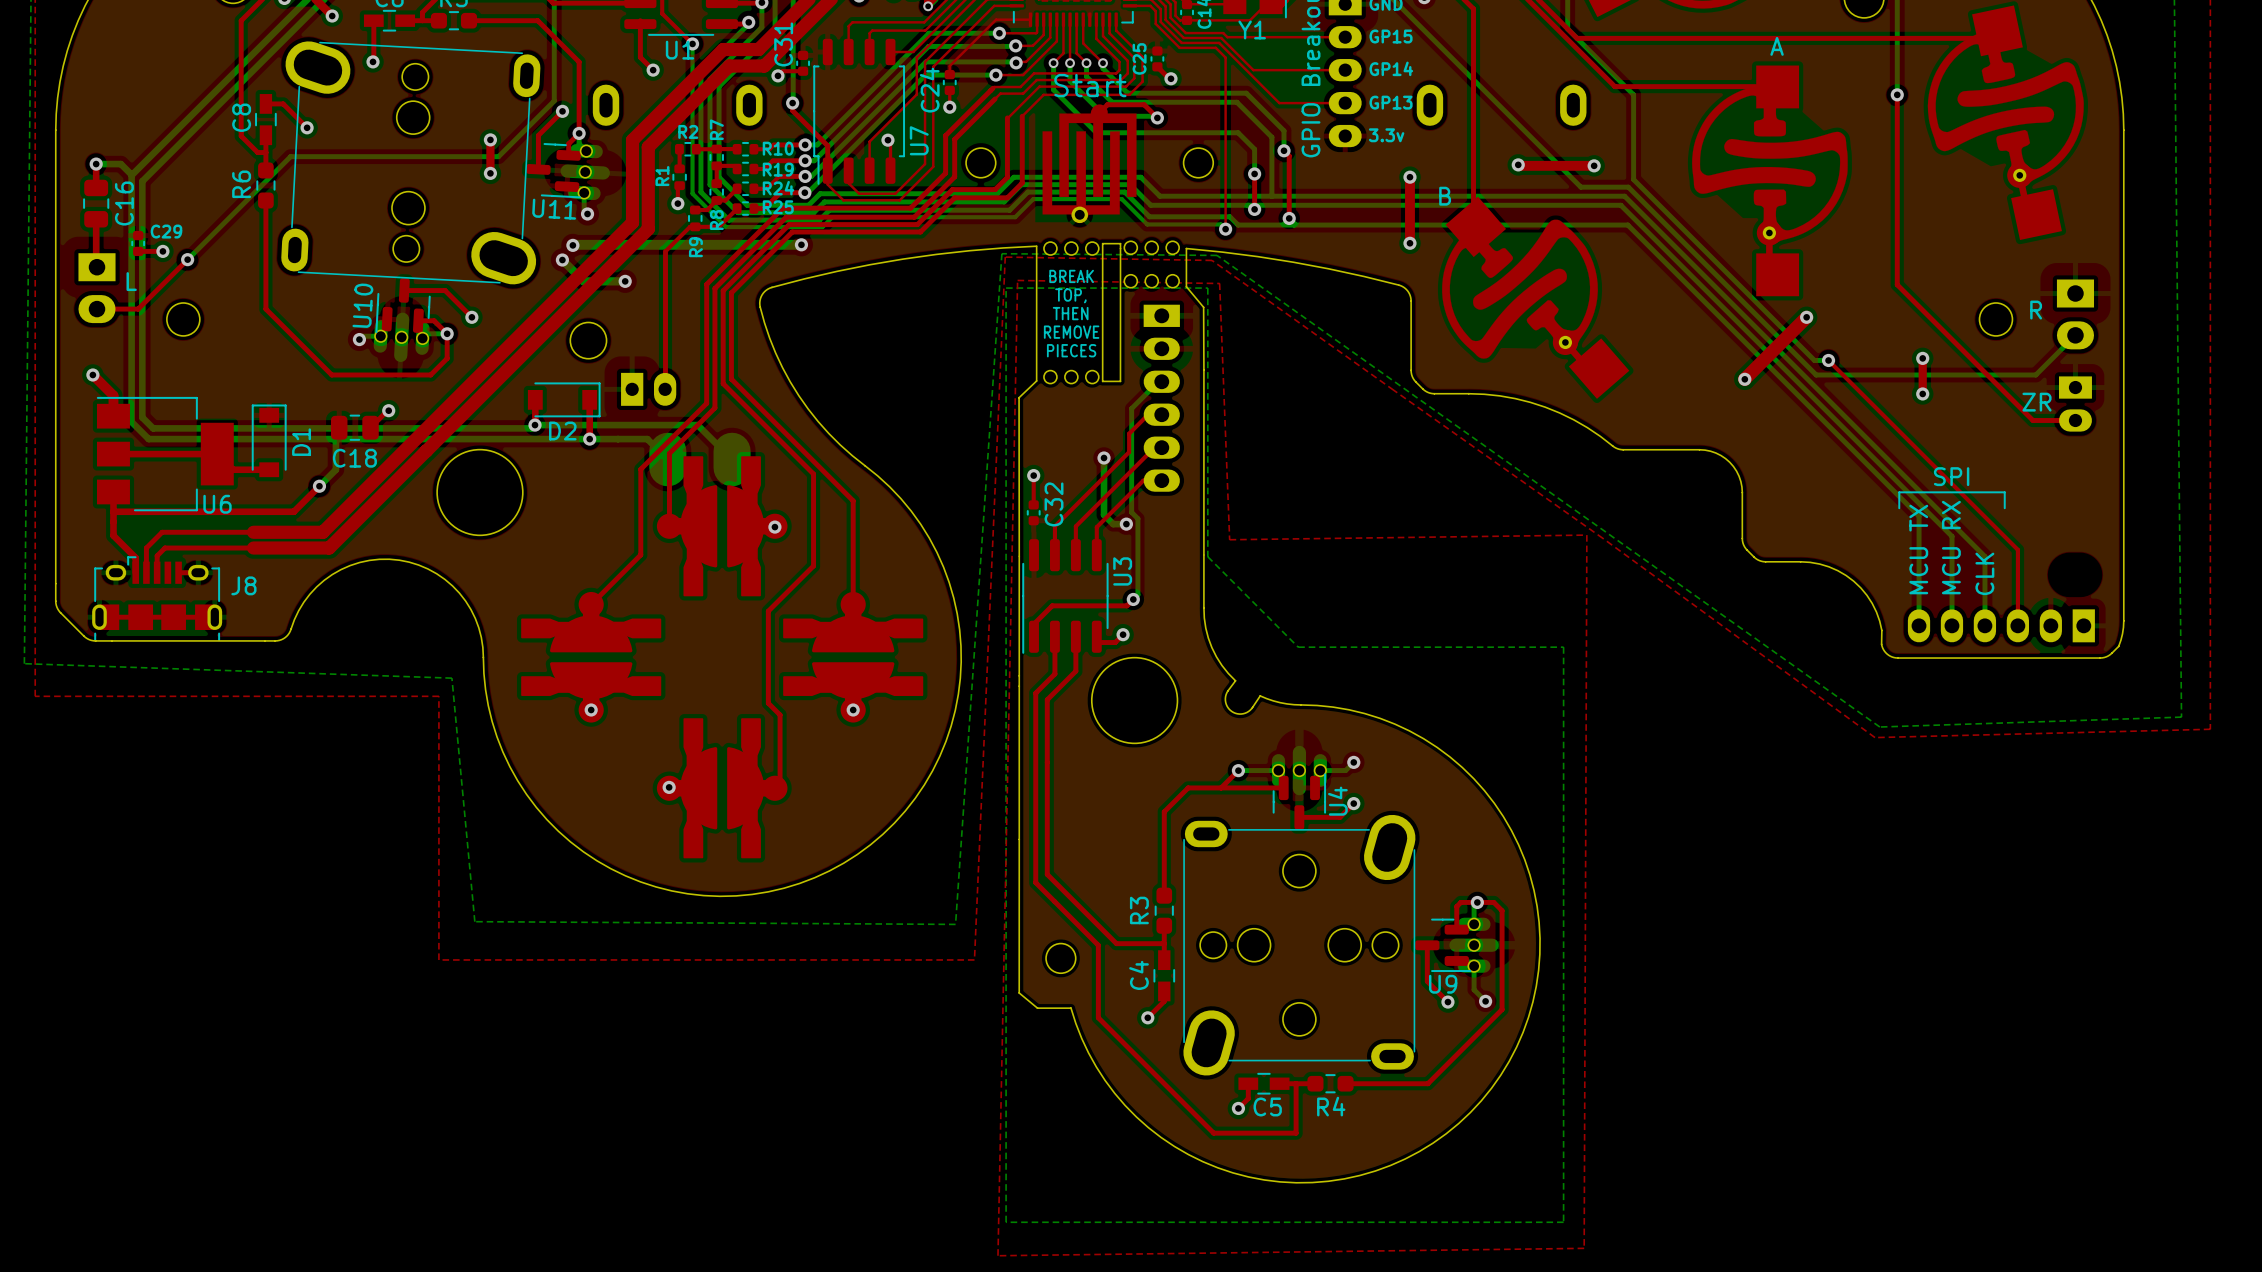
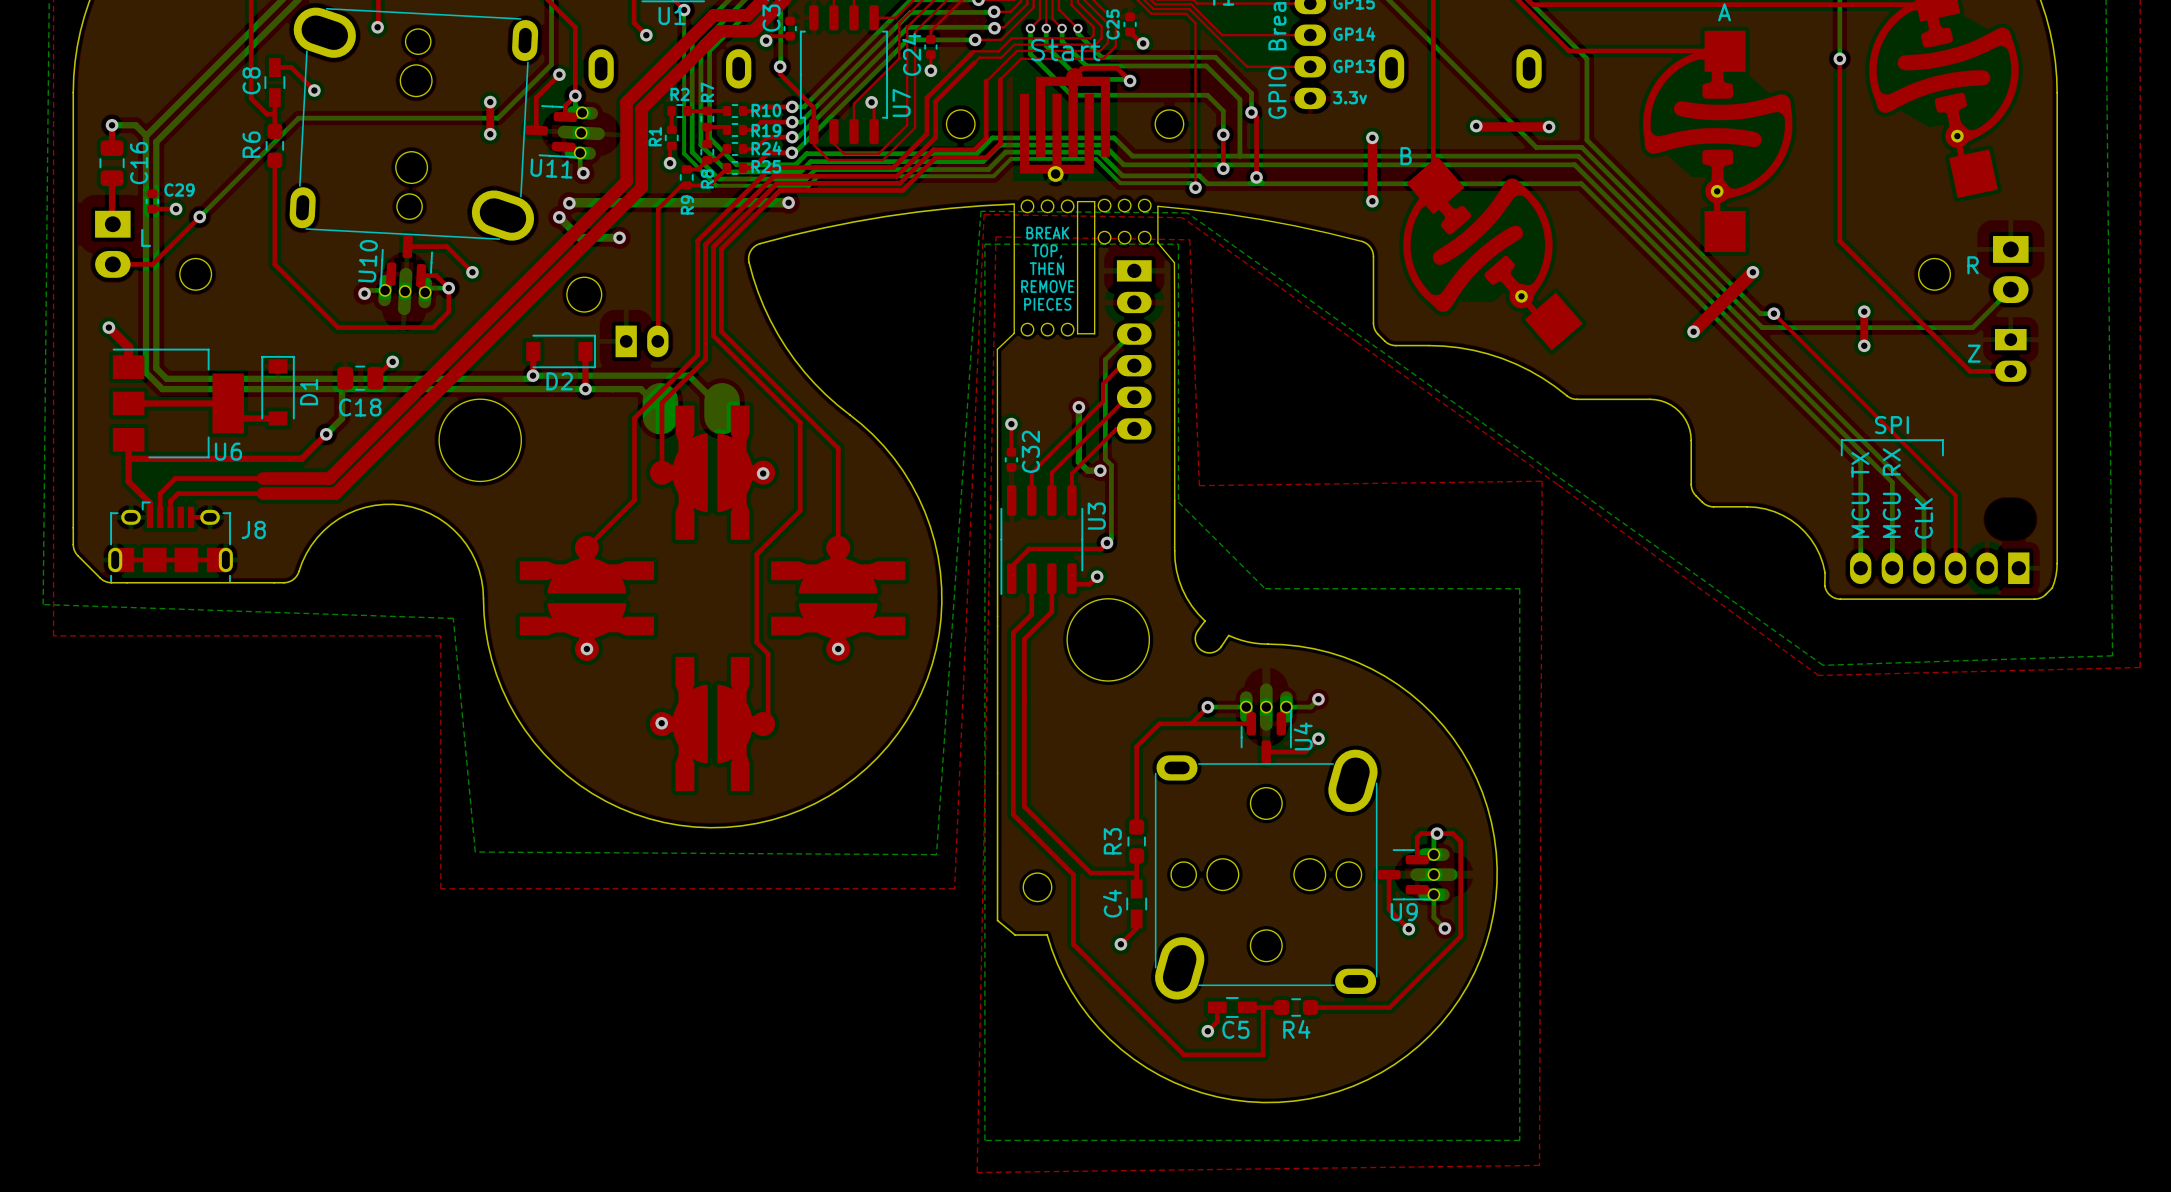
text: ZR (2037, 402) -> Z (1974, 353)

